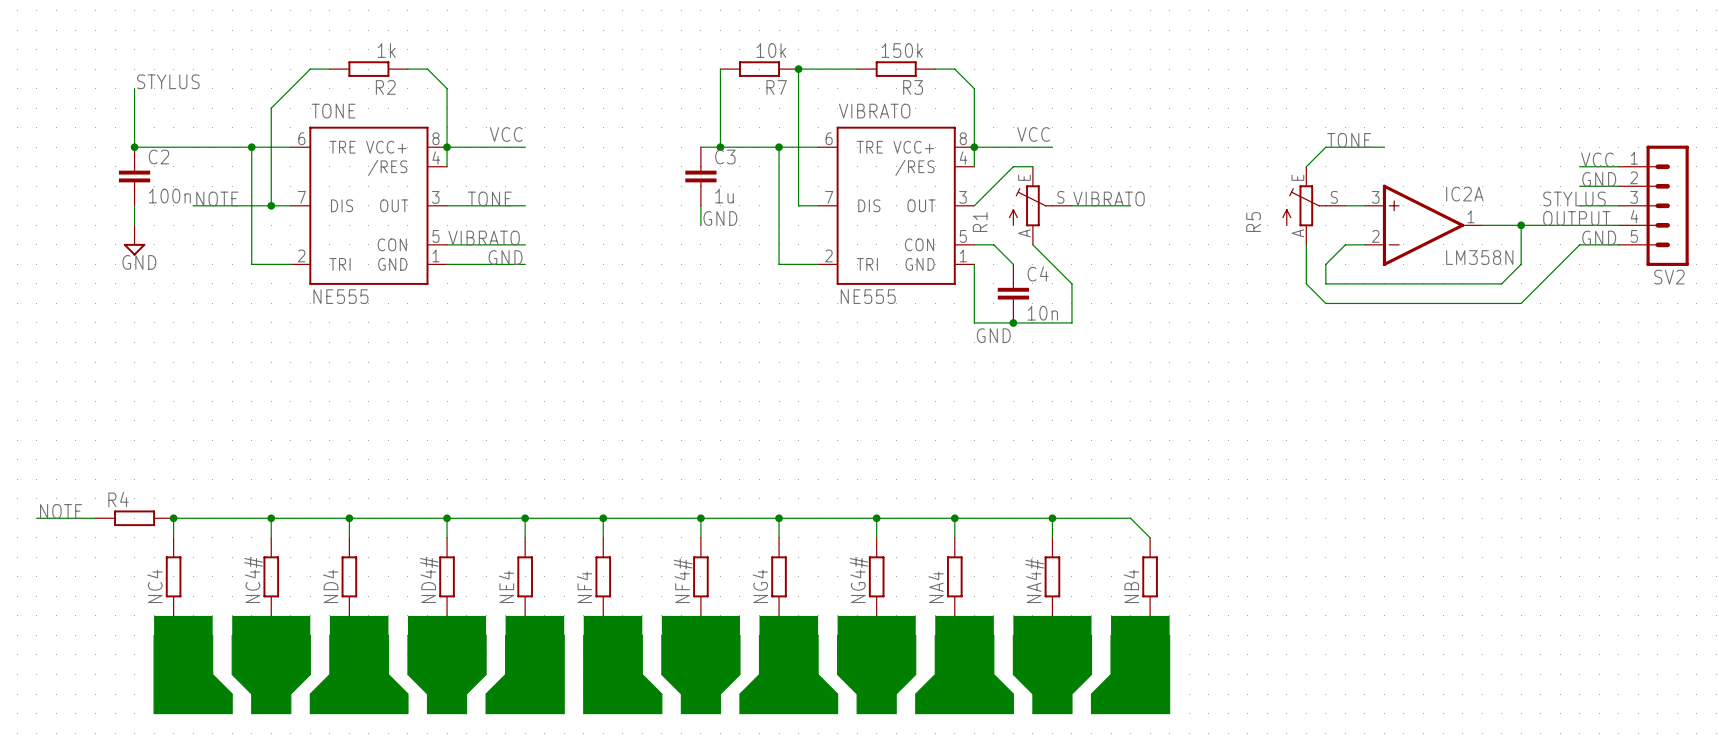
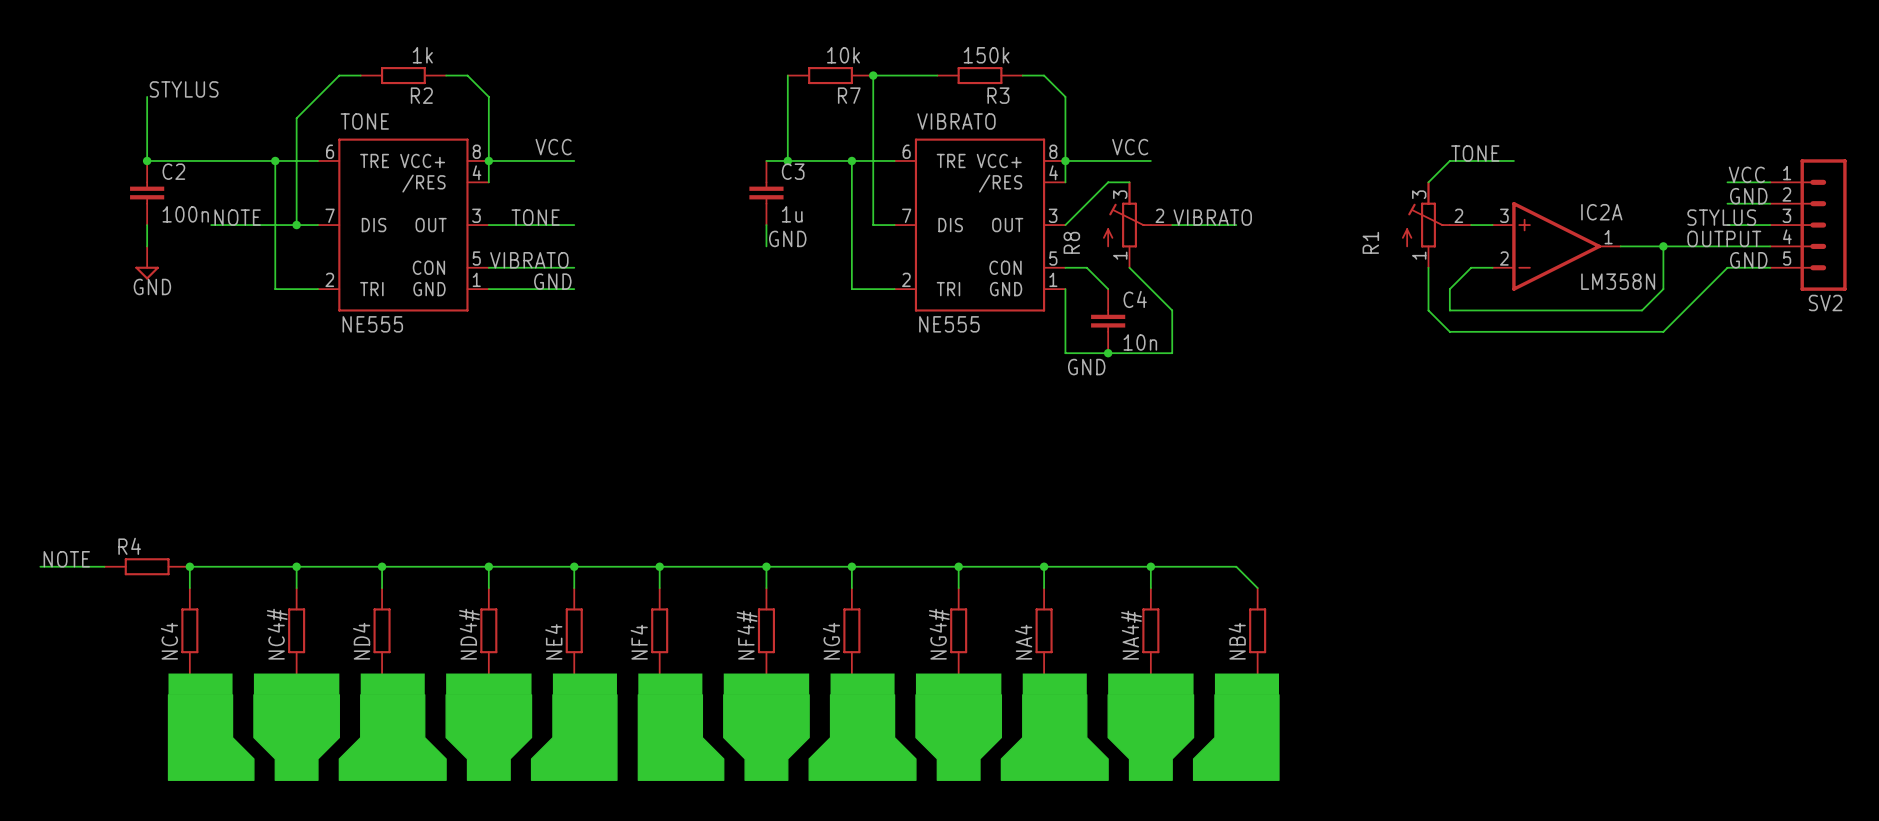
R1 symbol: [1008, 166, 1072, 245] -> [1402, 181, 1472, 268]
R8: none -> (1137, 224)
R5: (1313, 205) -> none

